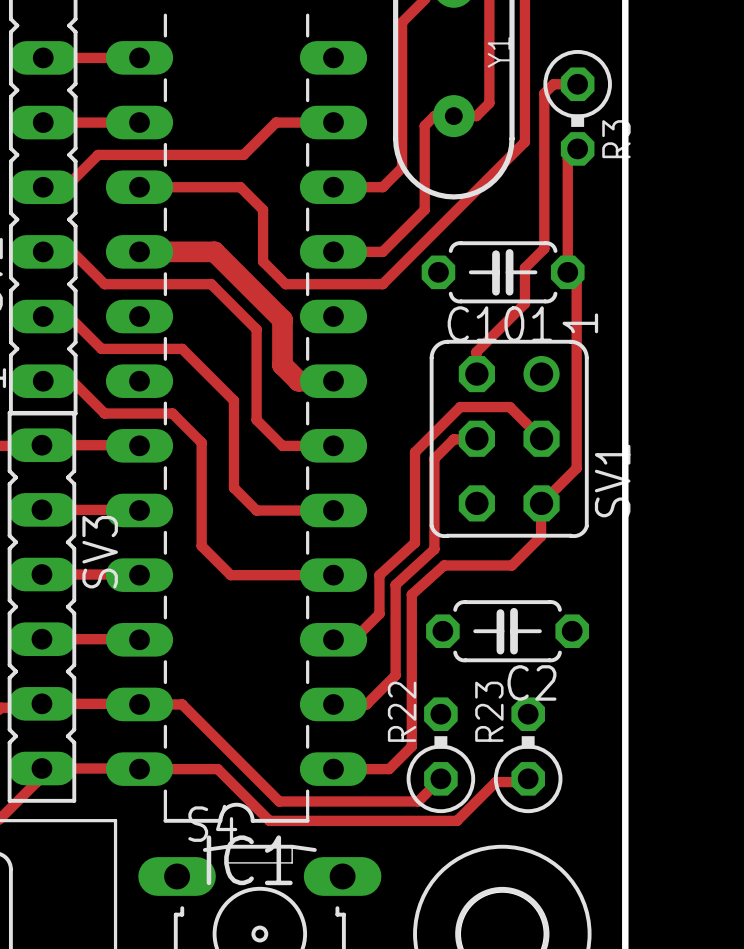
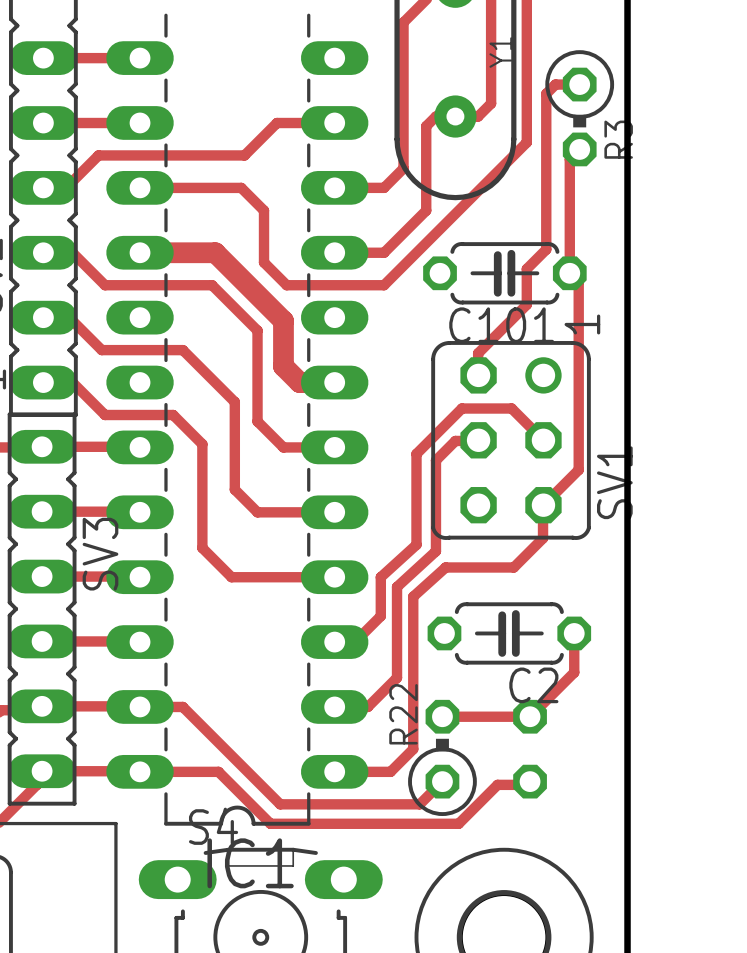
track: none -> (574, 633) (574, 672) (530, 716) (442, 716)
R23 side: top (528, 755) -> bottom (530, 749)

